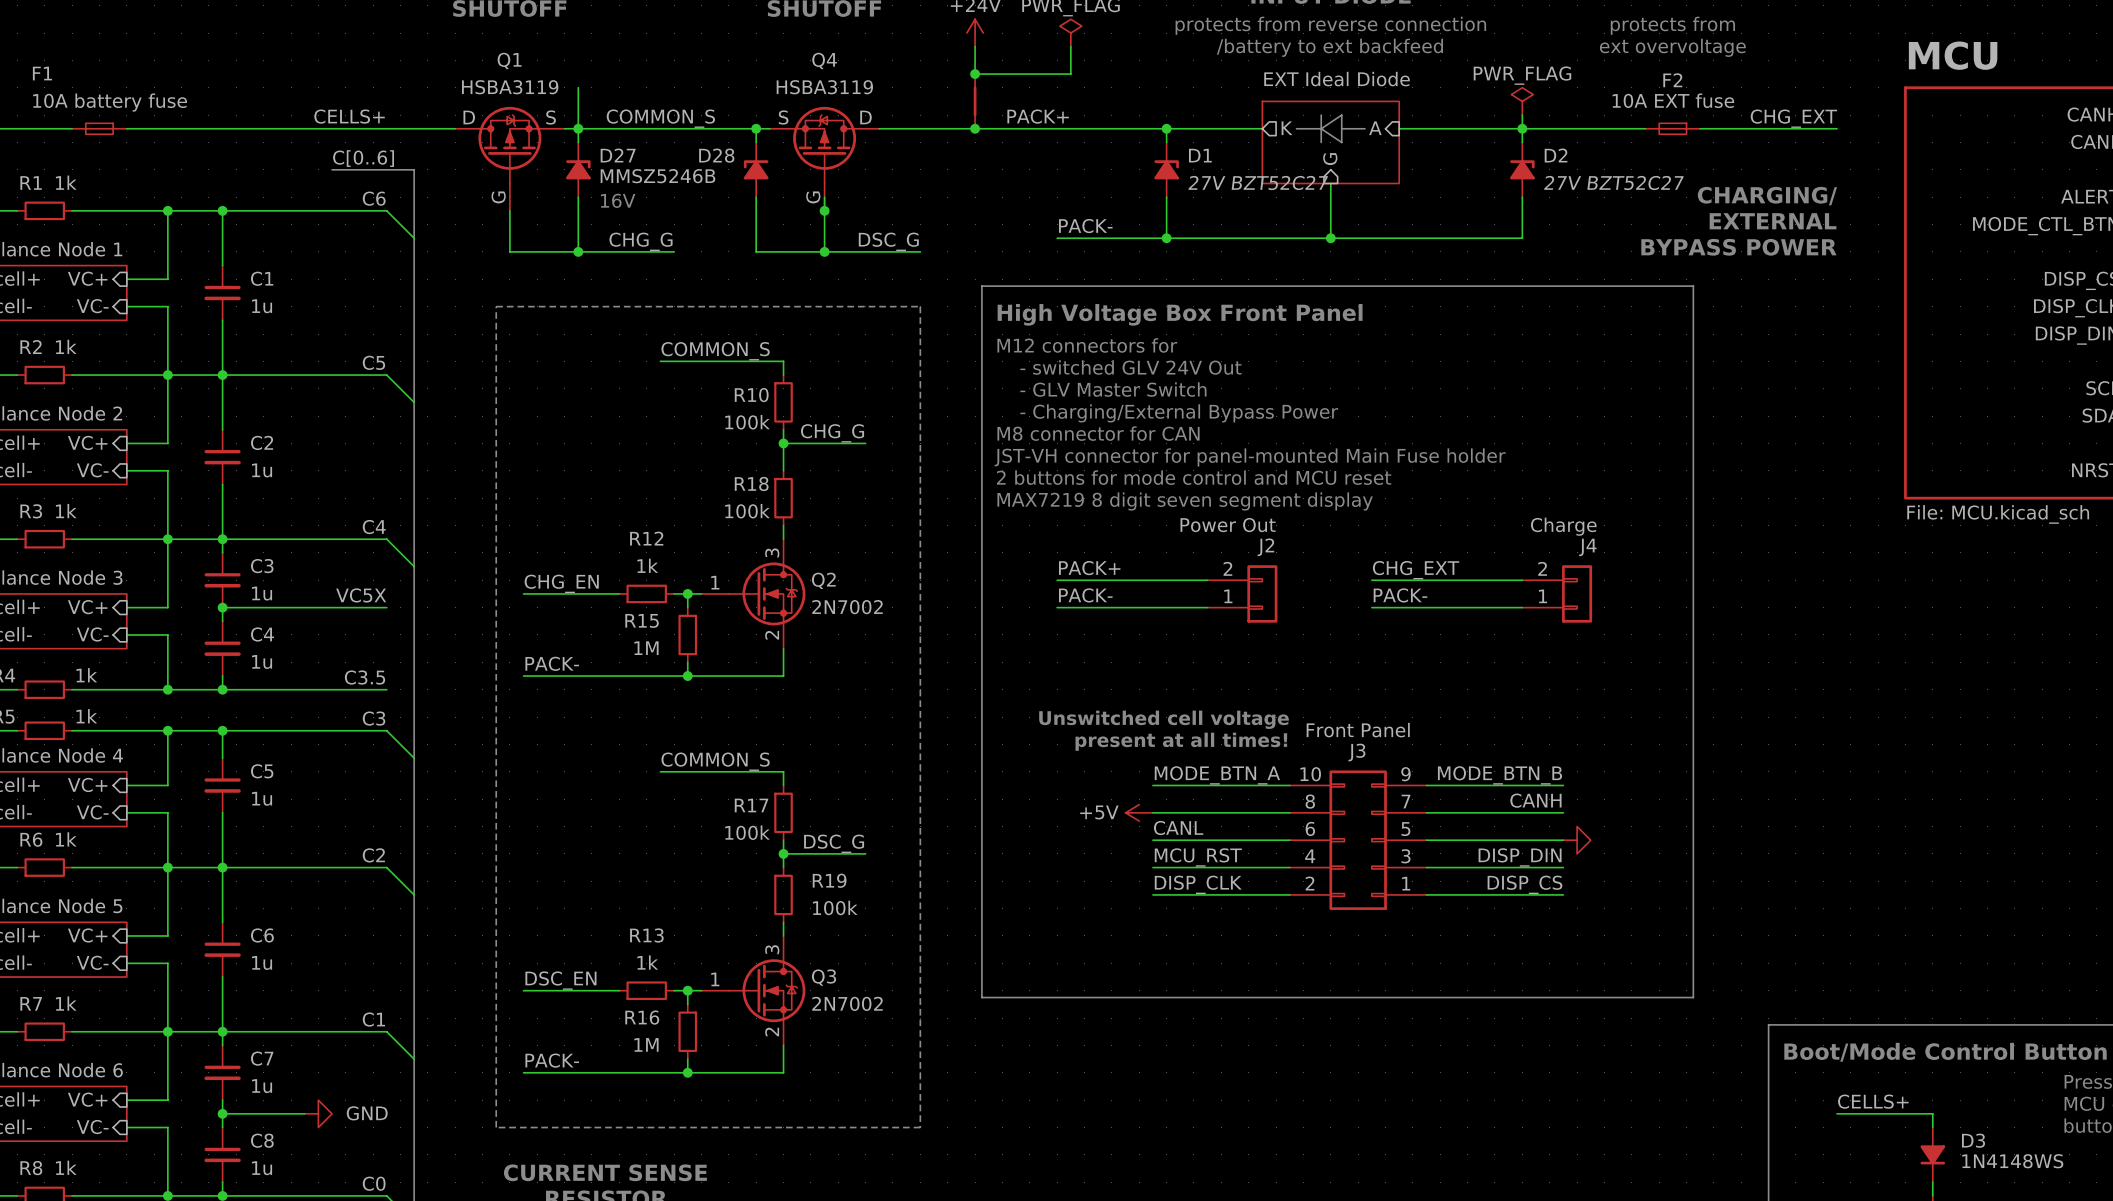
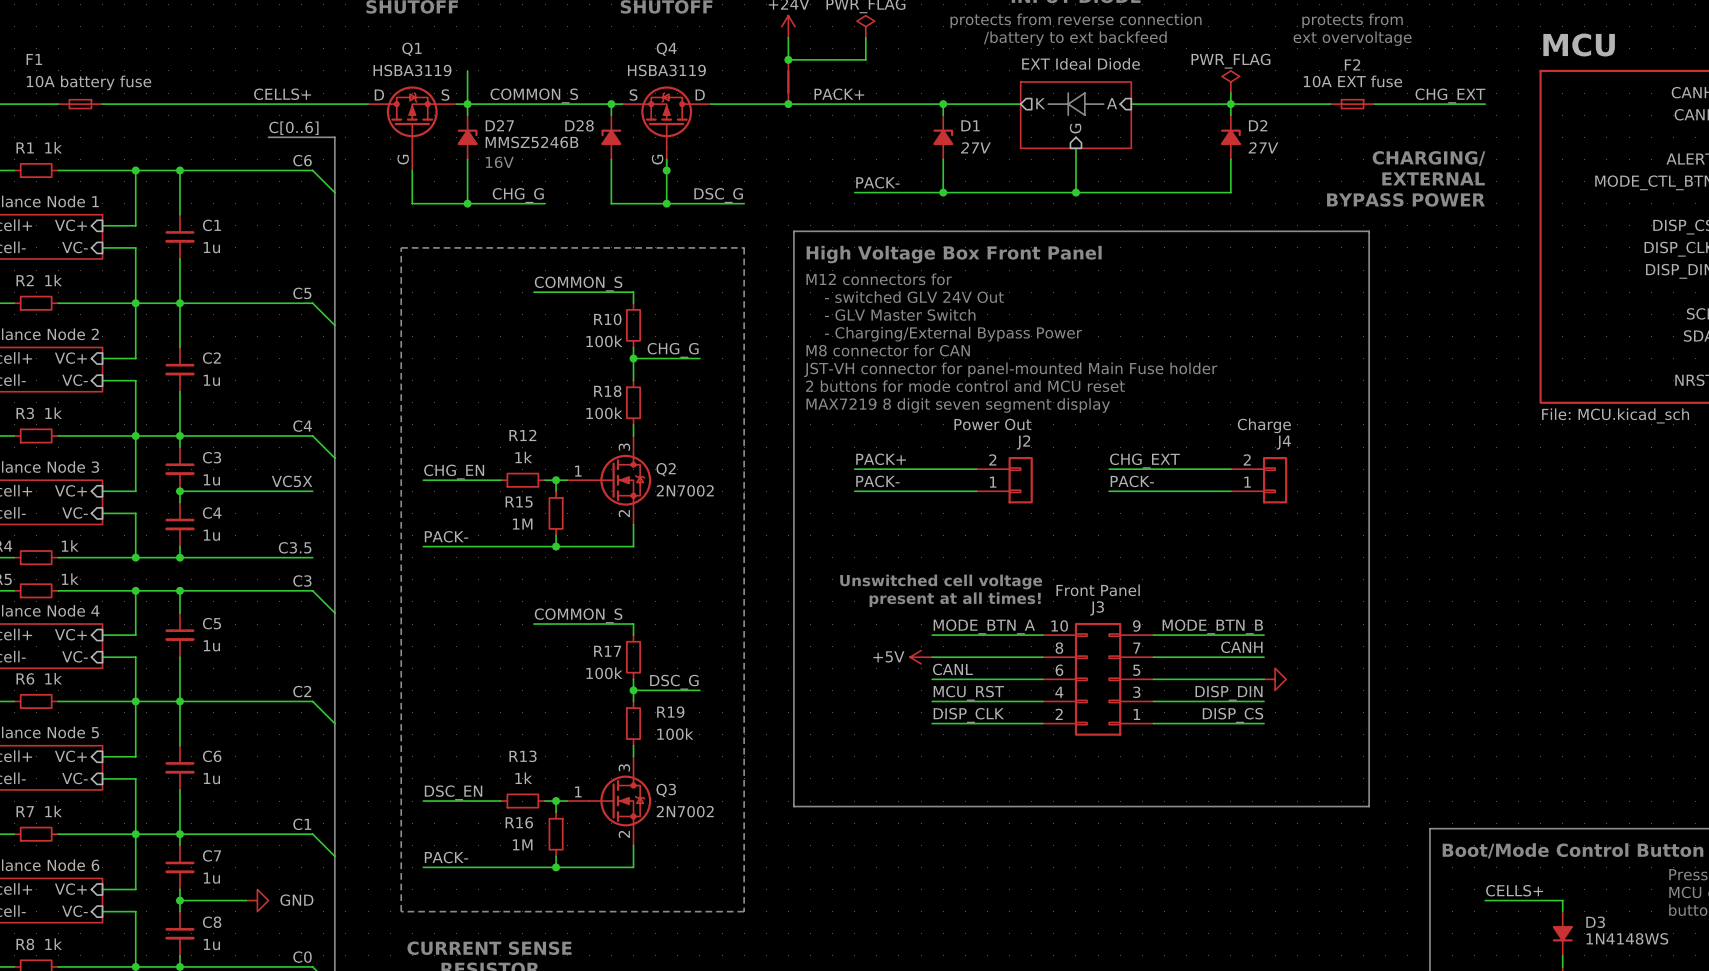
D1 value: 27V BZT52C27 (1258, 183) -> 27V (975, 147)
D2 value: 27V BZT52C27 (1613, 183) -> 27V (1263, 147)

